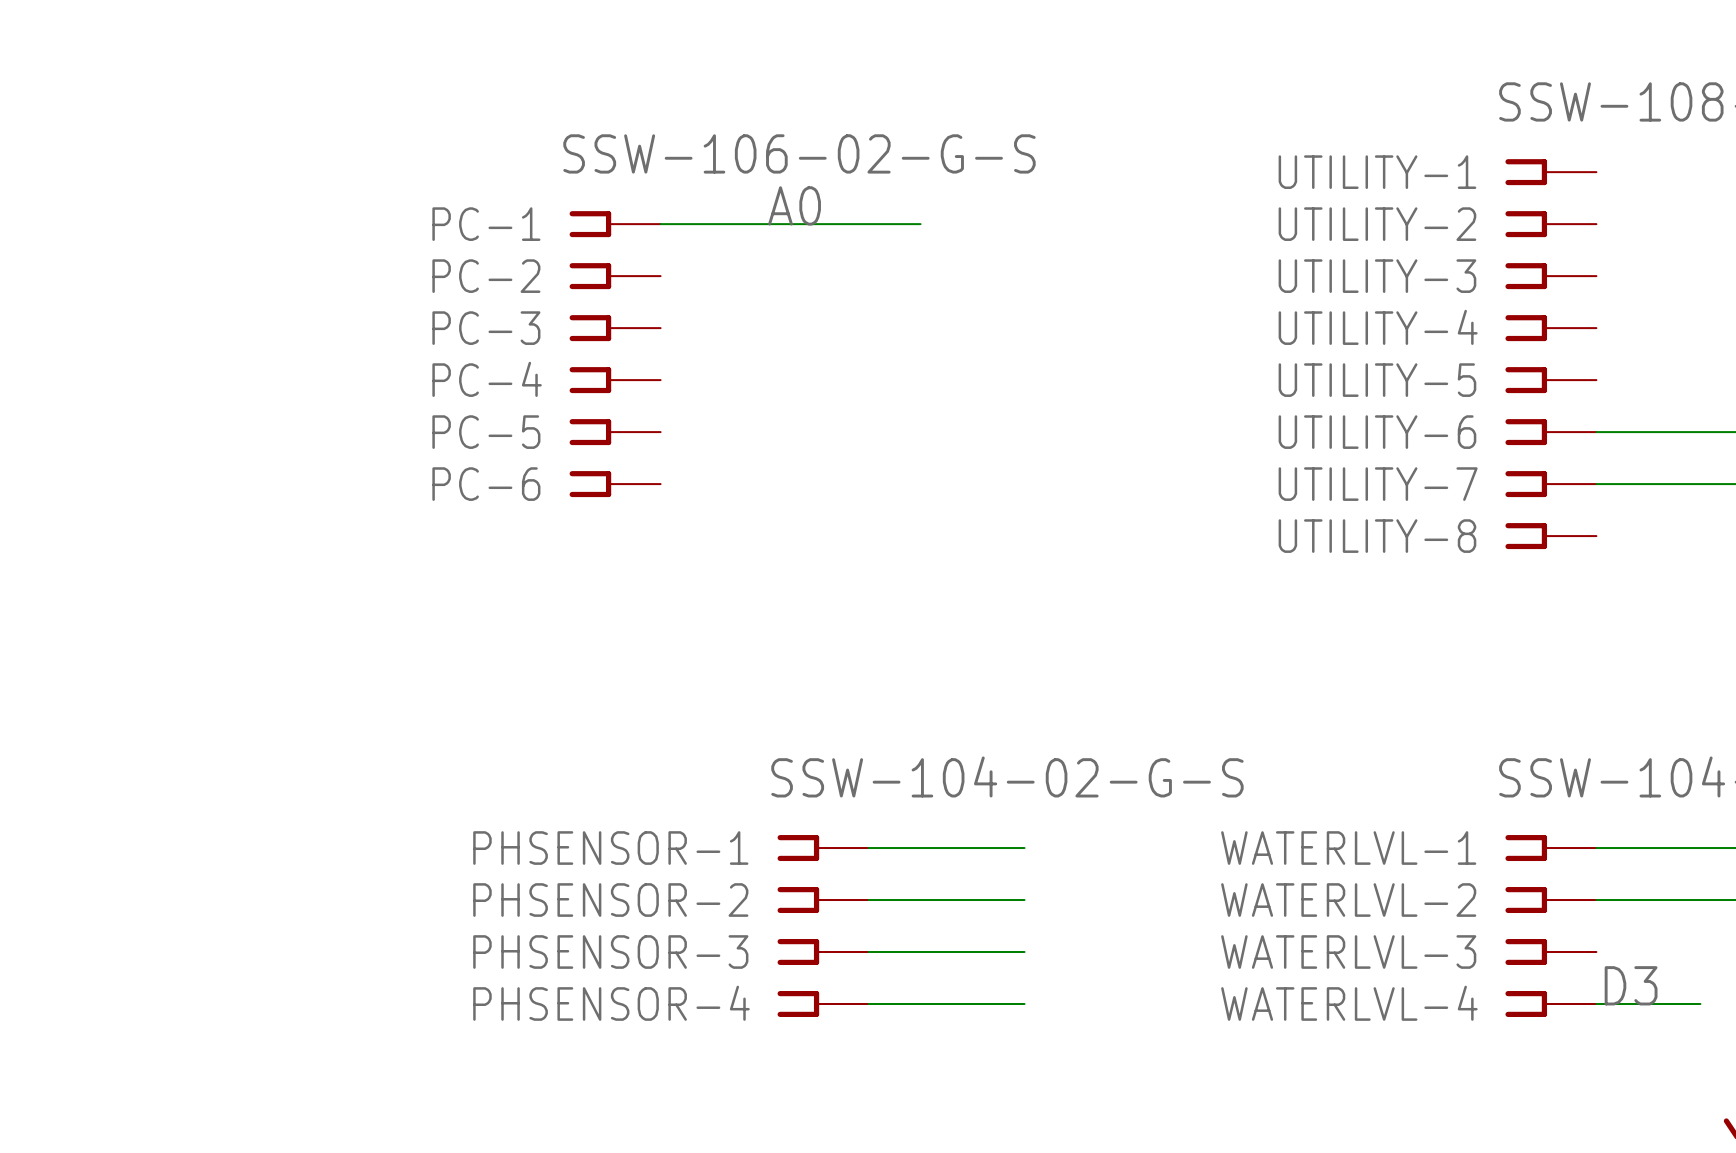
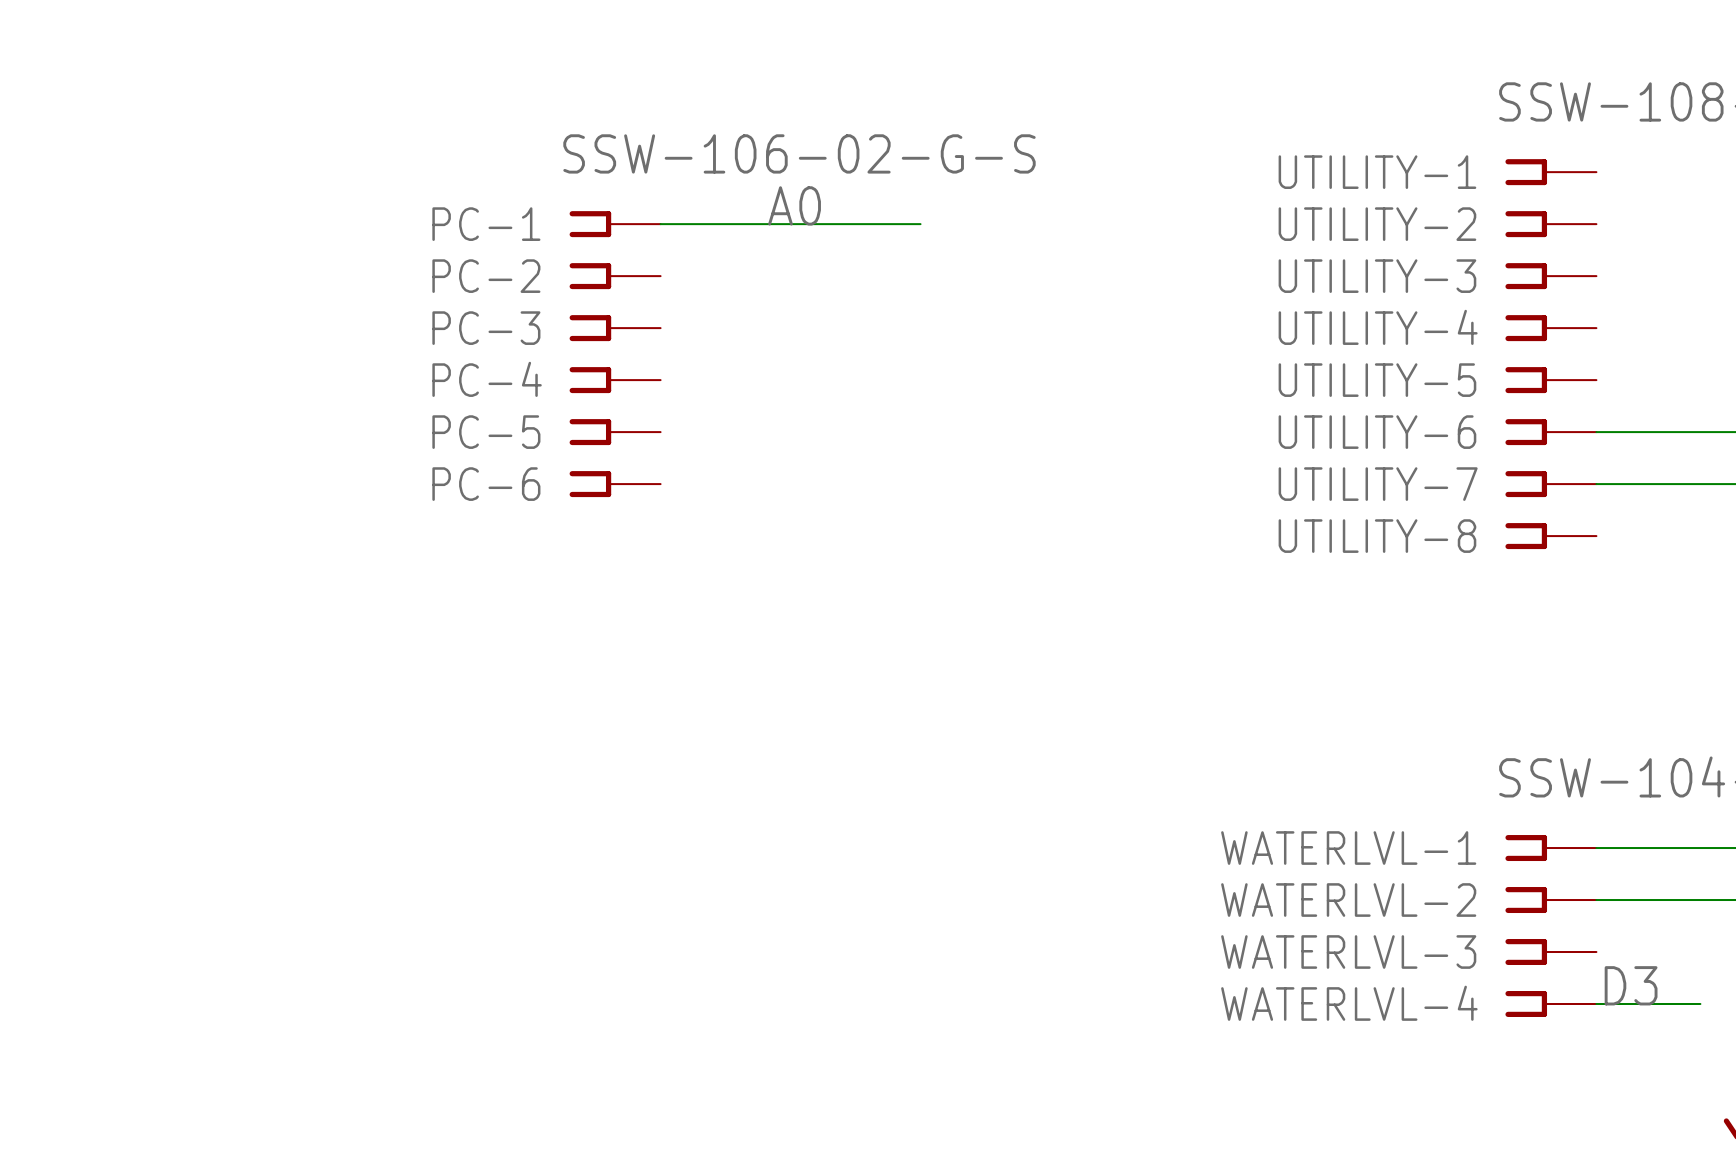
PHSENSOR-1: SSW-104-02-G-S (823, 848) -> none
wire: (868, 848) (1024, 848) -> none
PHSENSOR-2: (823, 900) -> none
wire: (868, 900) (1024, 900) -> none
PHSENSOR-3: (823, 952) -> none
wire: (868, 952) (1024, 952) -> none
PHSENSOR-4: (823, 1003) -> none
wire: (868, 1003) (1024, 1003) -> none

